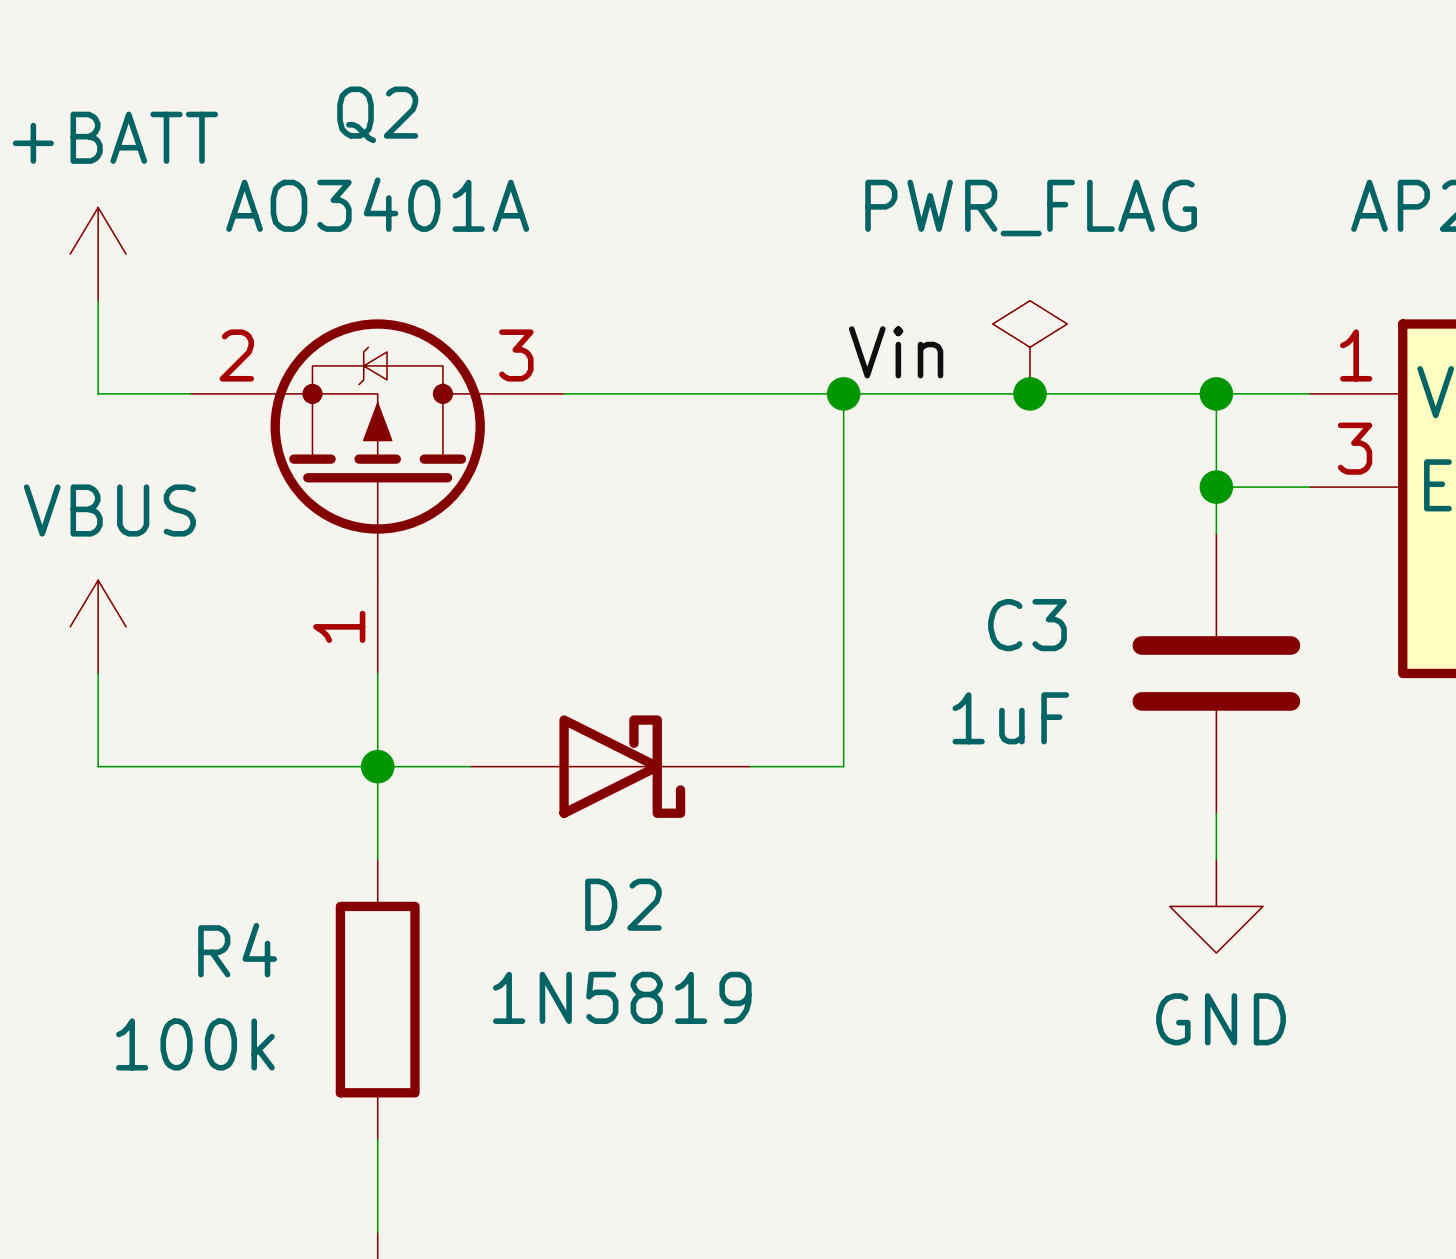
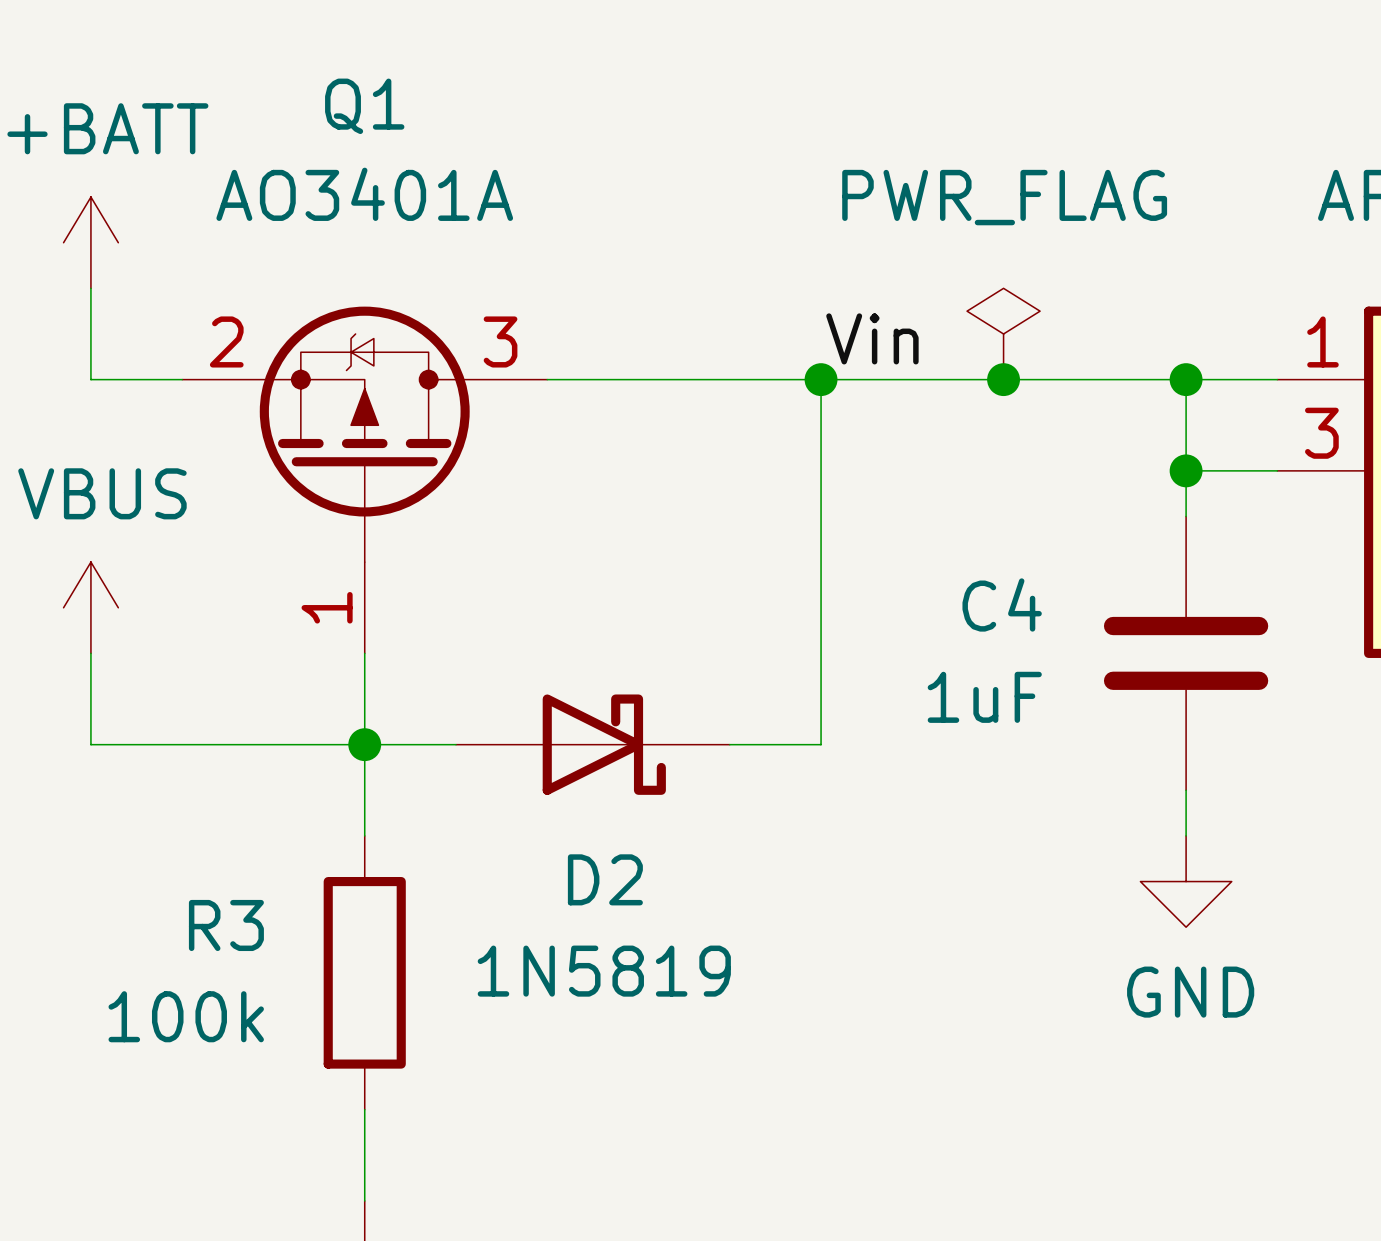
Q2 name: Q2 (377, 114) -> Q1 (364, 106)
C3 name: C3 (1027, 625) -> C4 (1002, 604)
R4 name: R4 (237, 950) -> R3 (226, 925)

